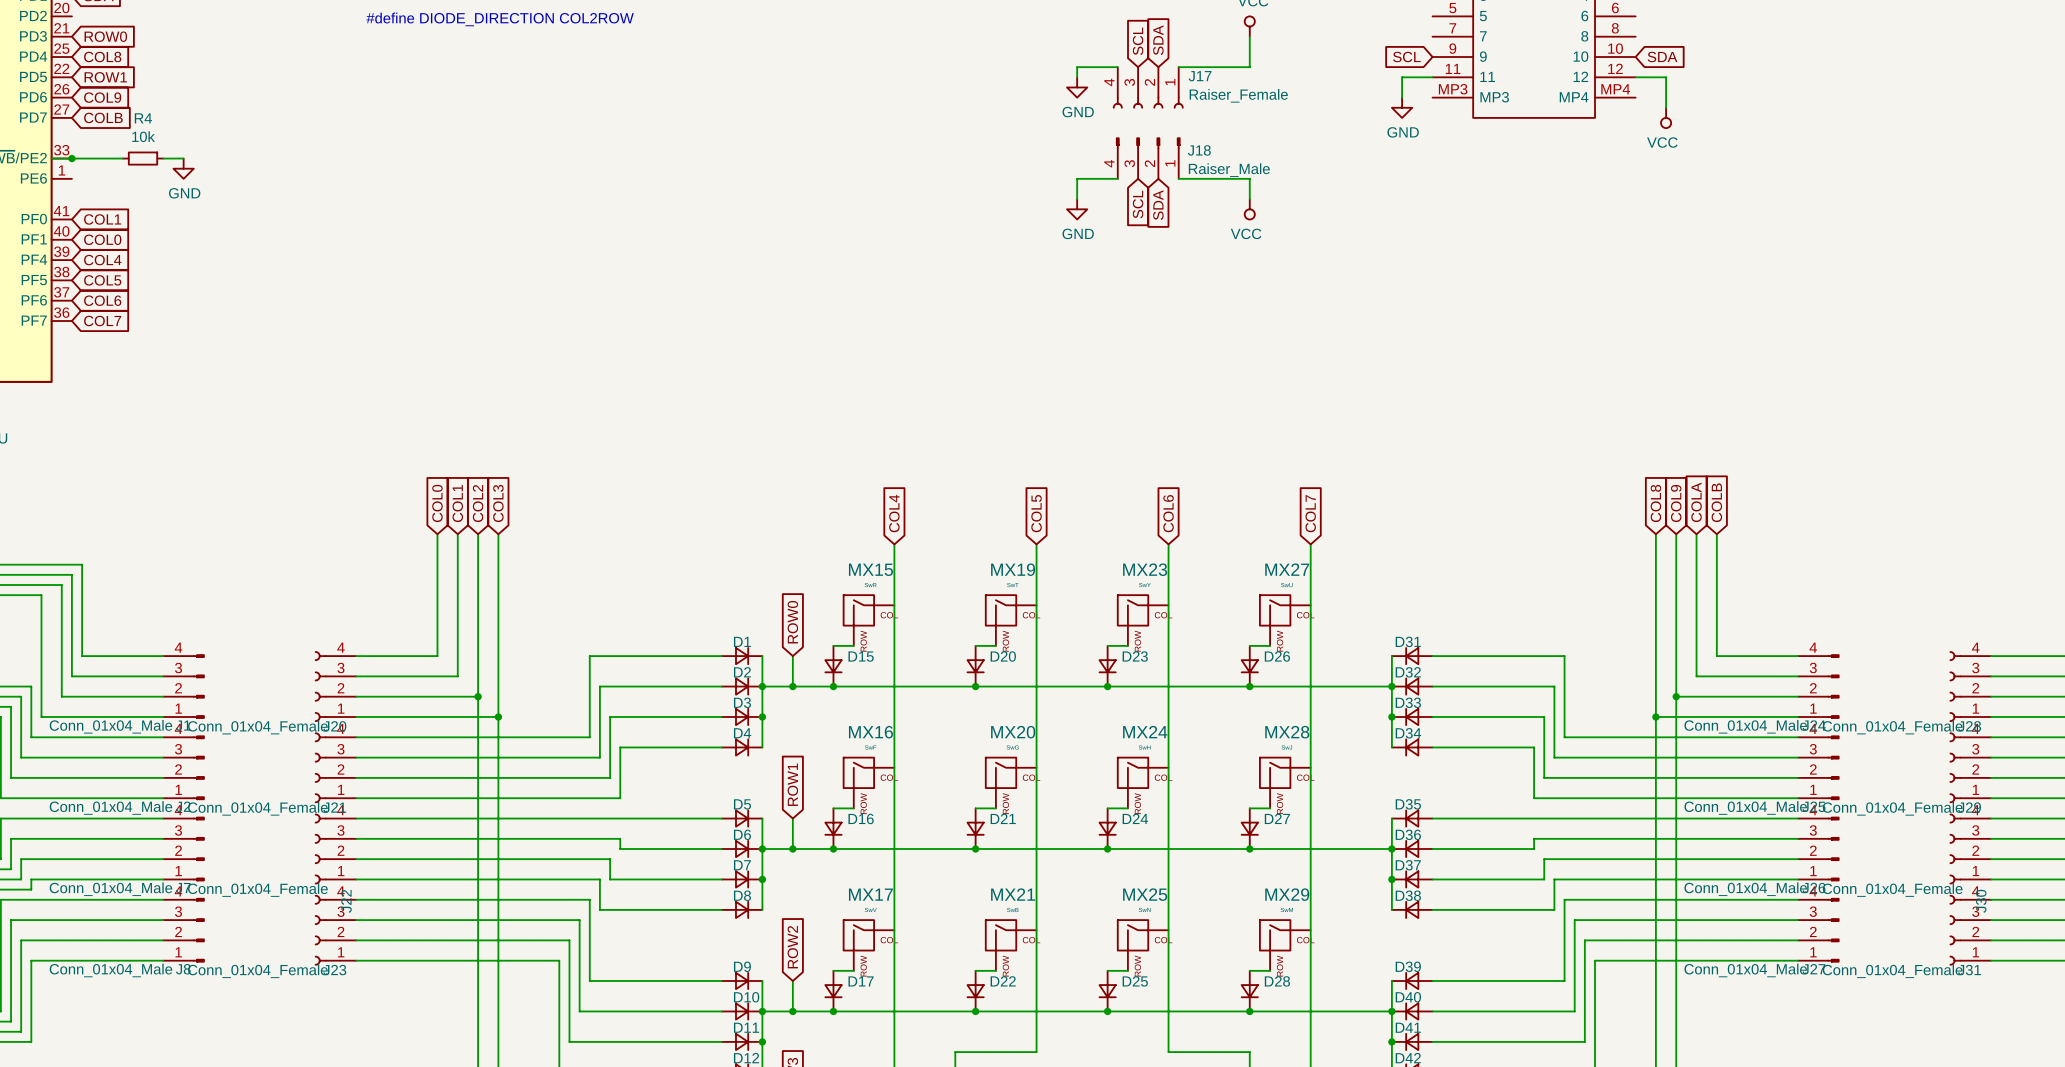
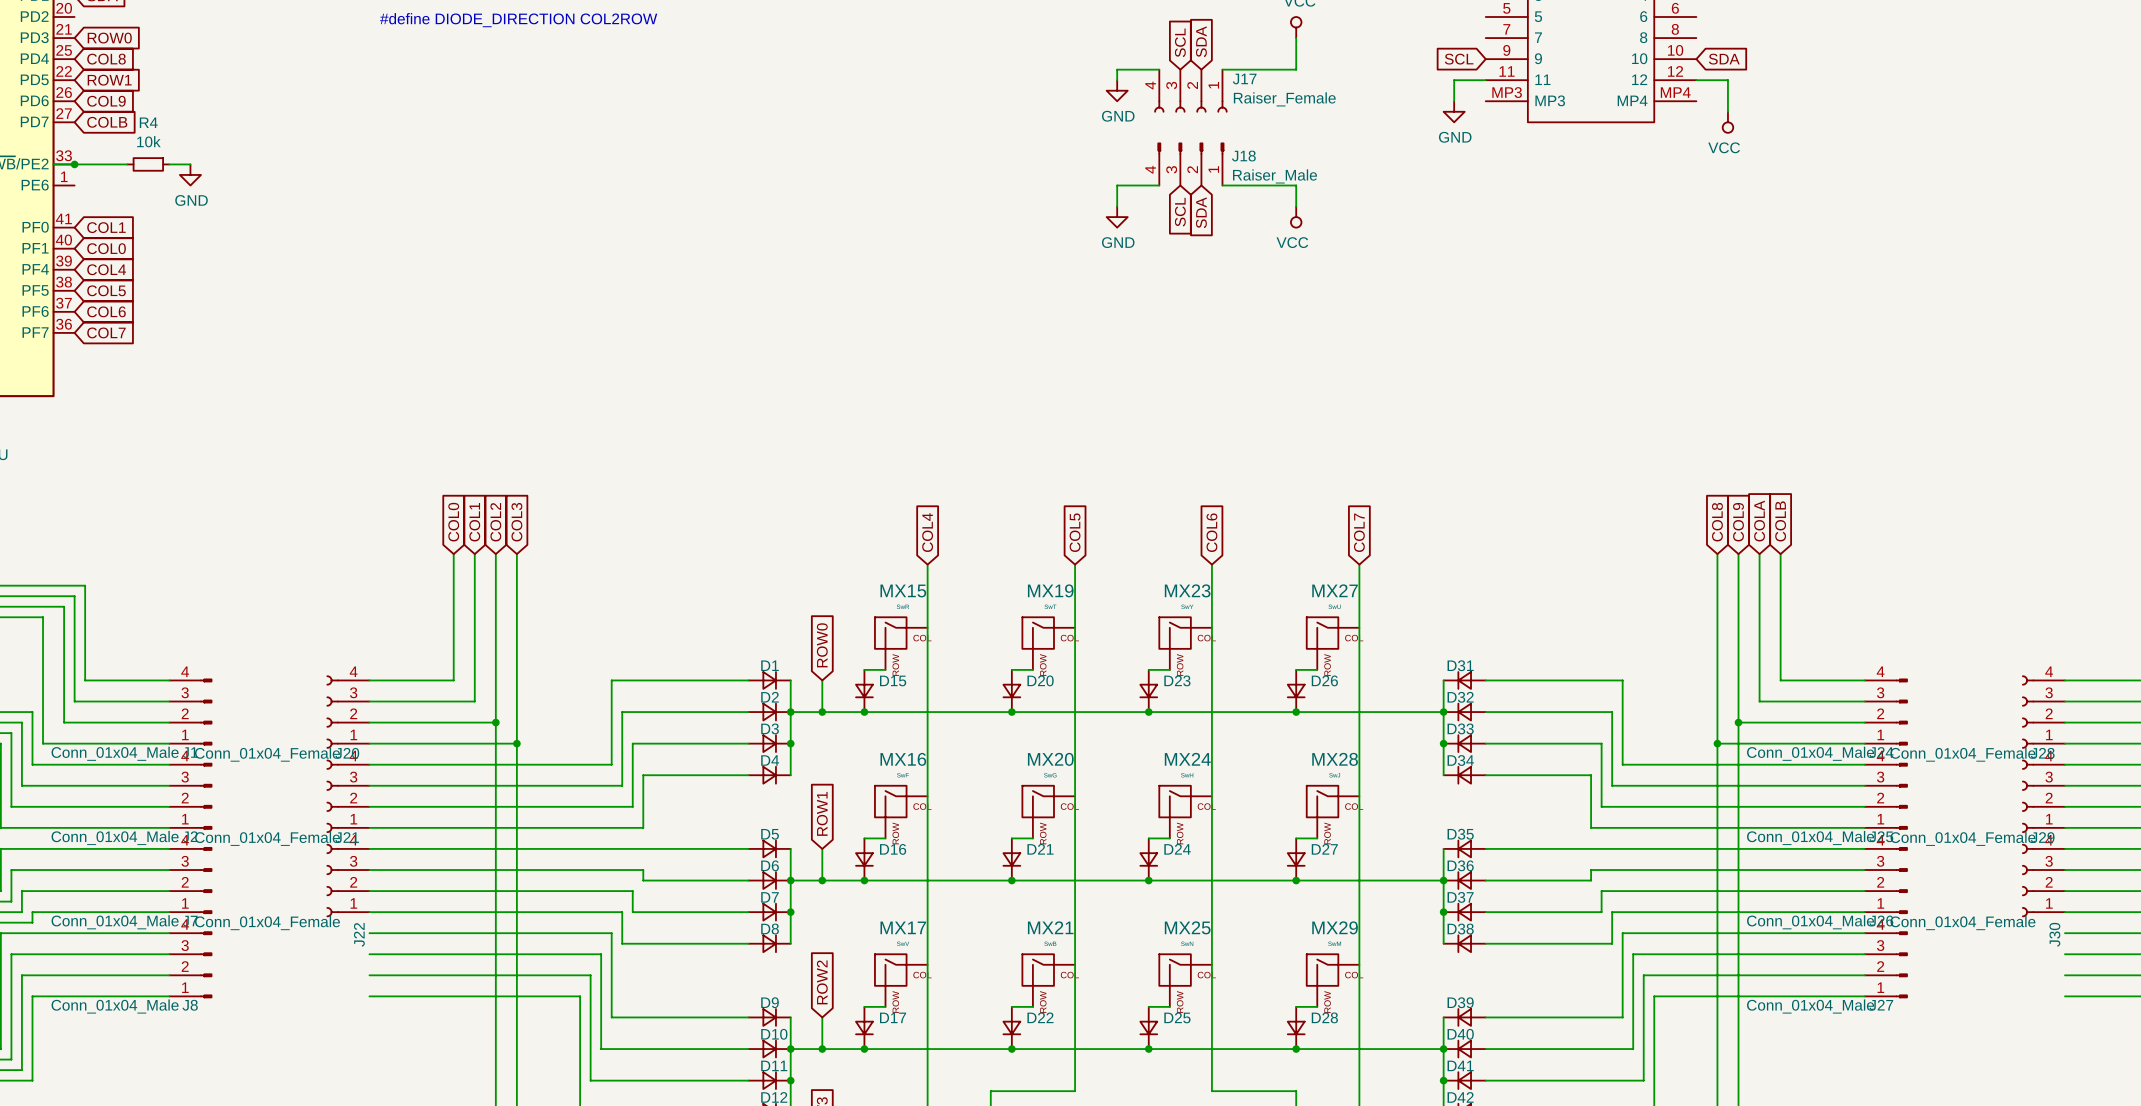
J23: Conn_01x04_Female (335, 930) -> none
J31: Conn_01x04_Female (1970, 930) -> none

